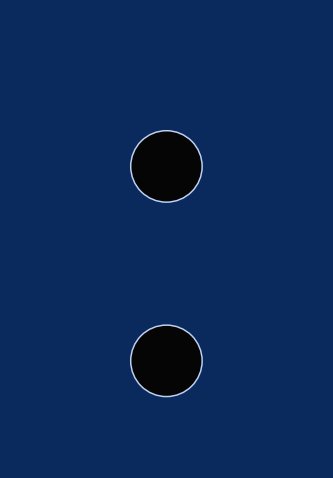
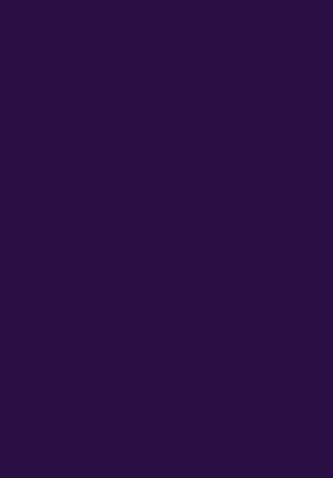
part: (166, 166) -> none
part: (166, 360) -> none

